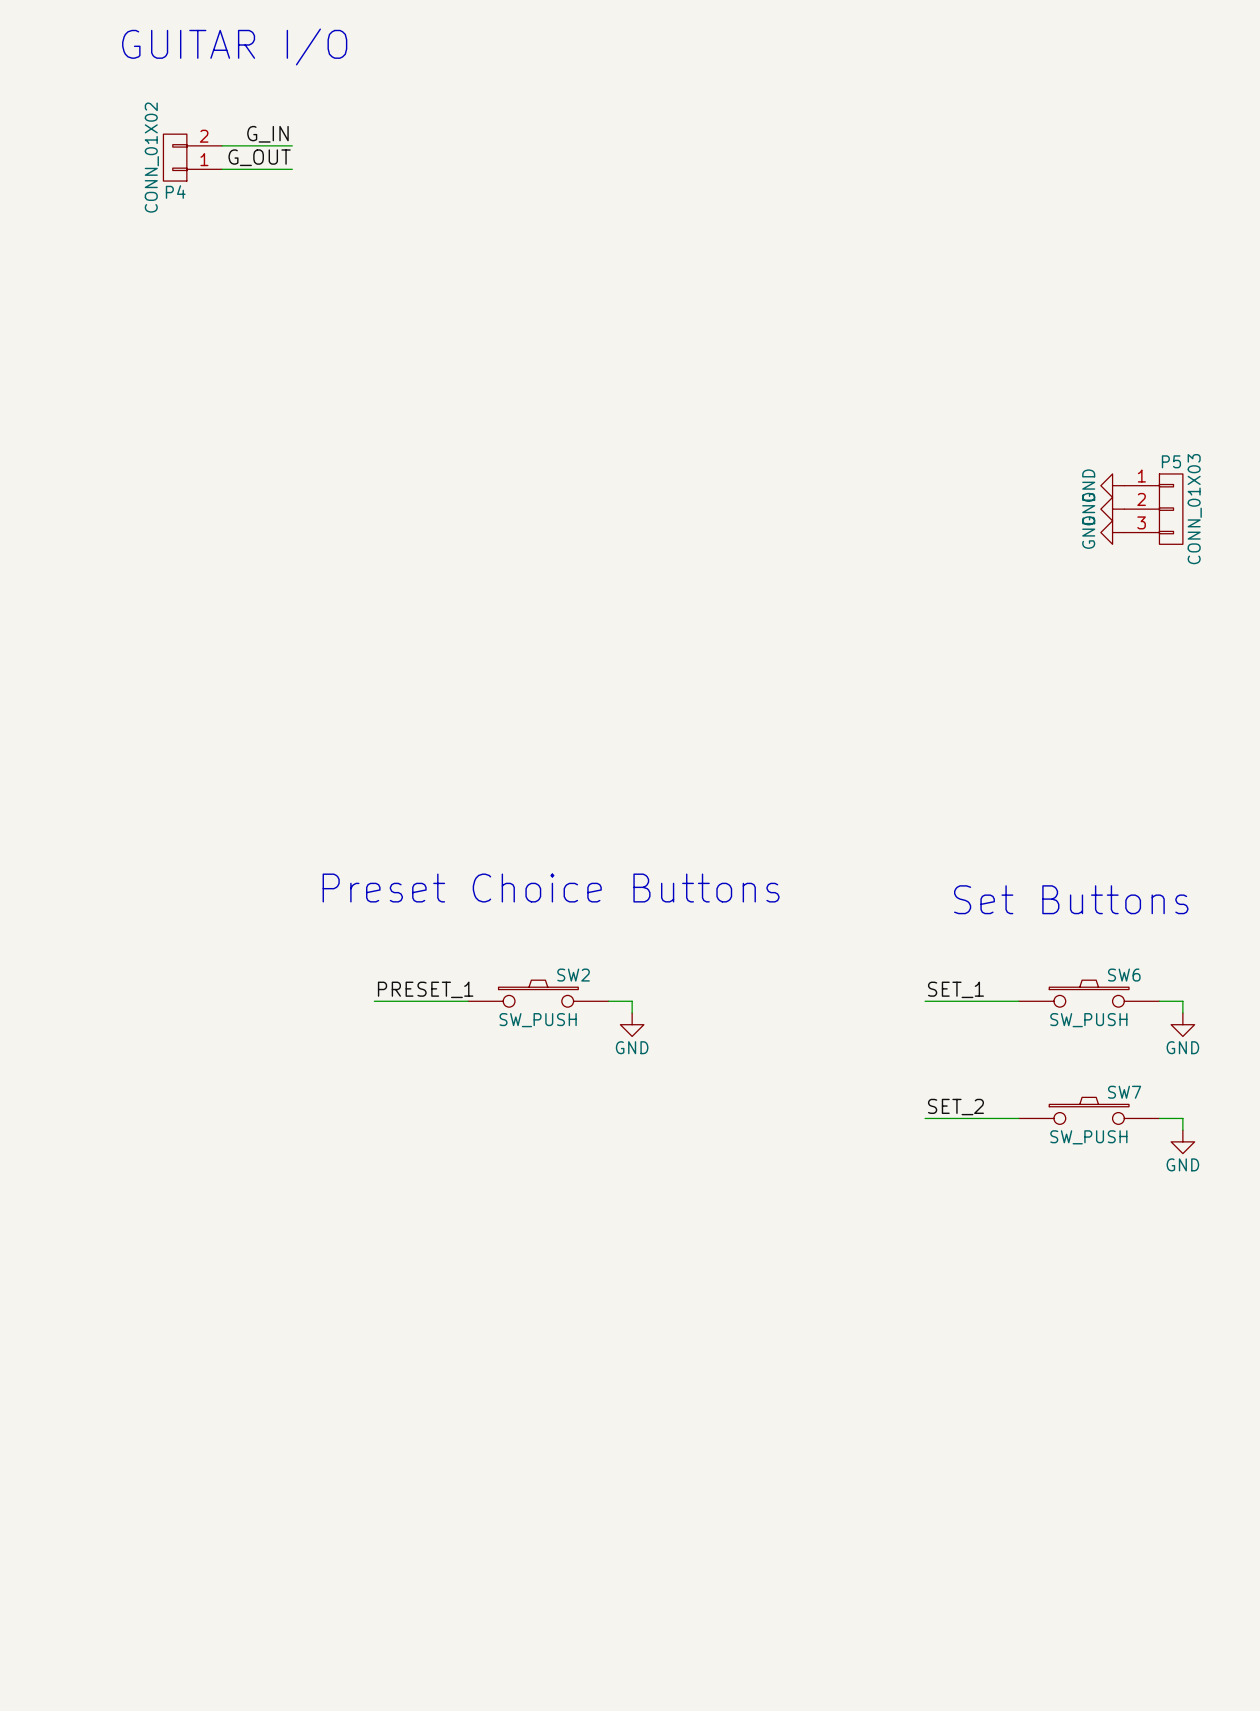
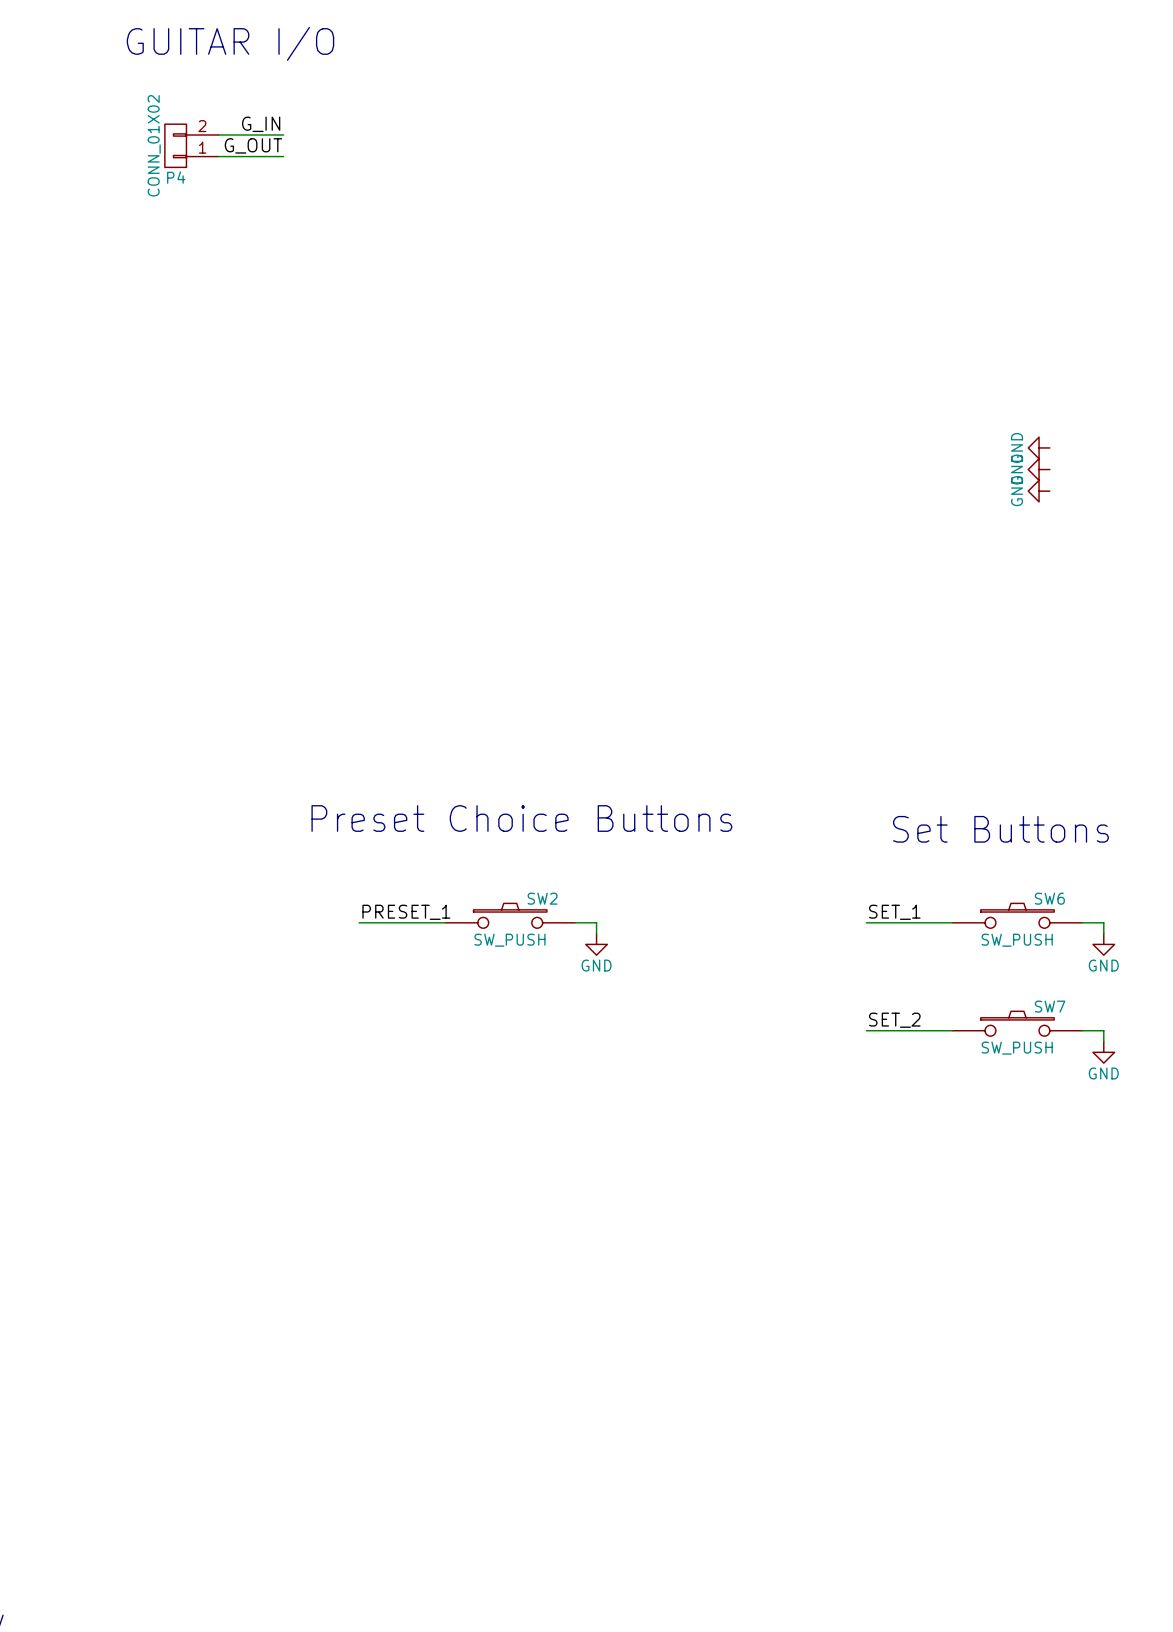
P5: CONN_01X03 (1153, 509) -> none

